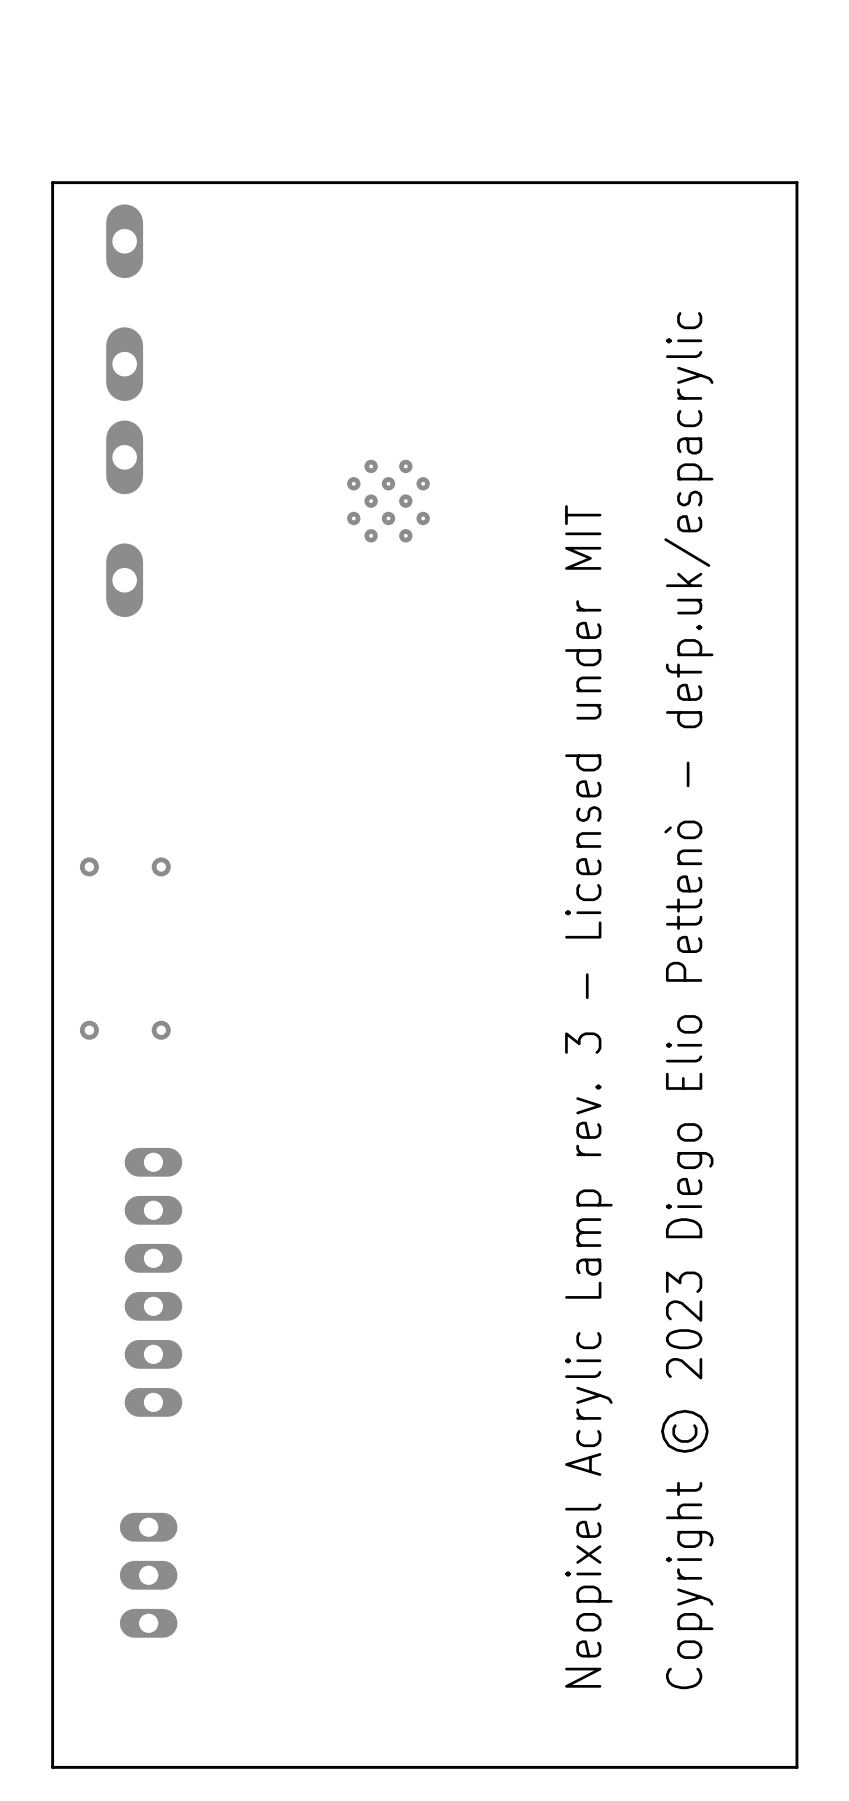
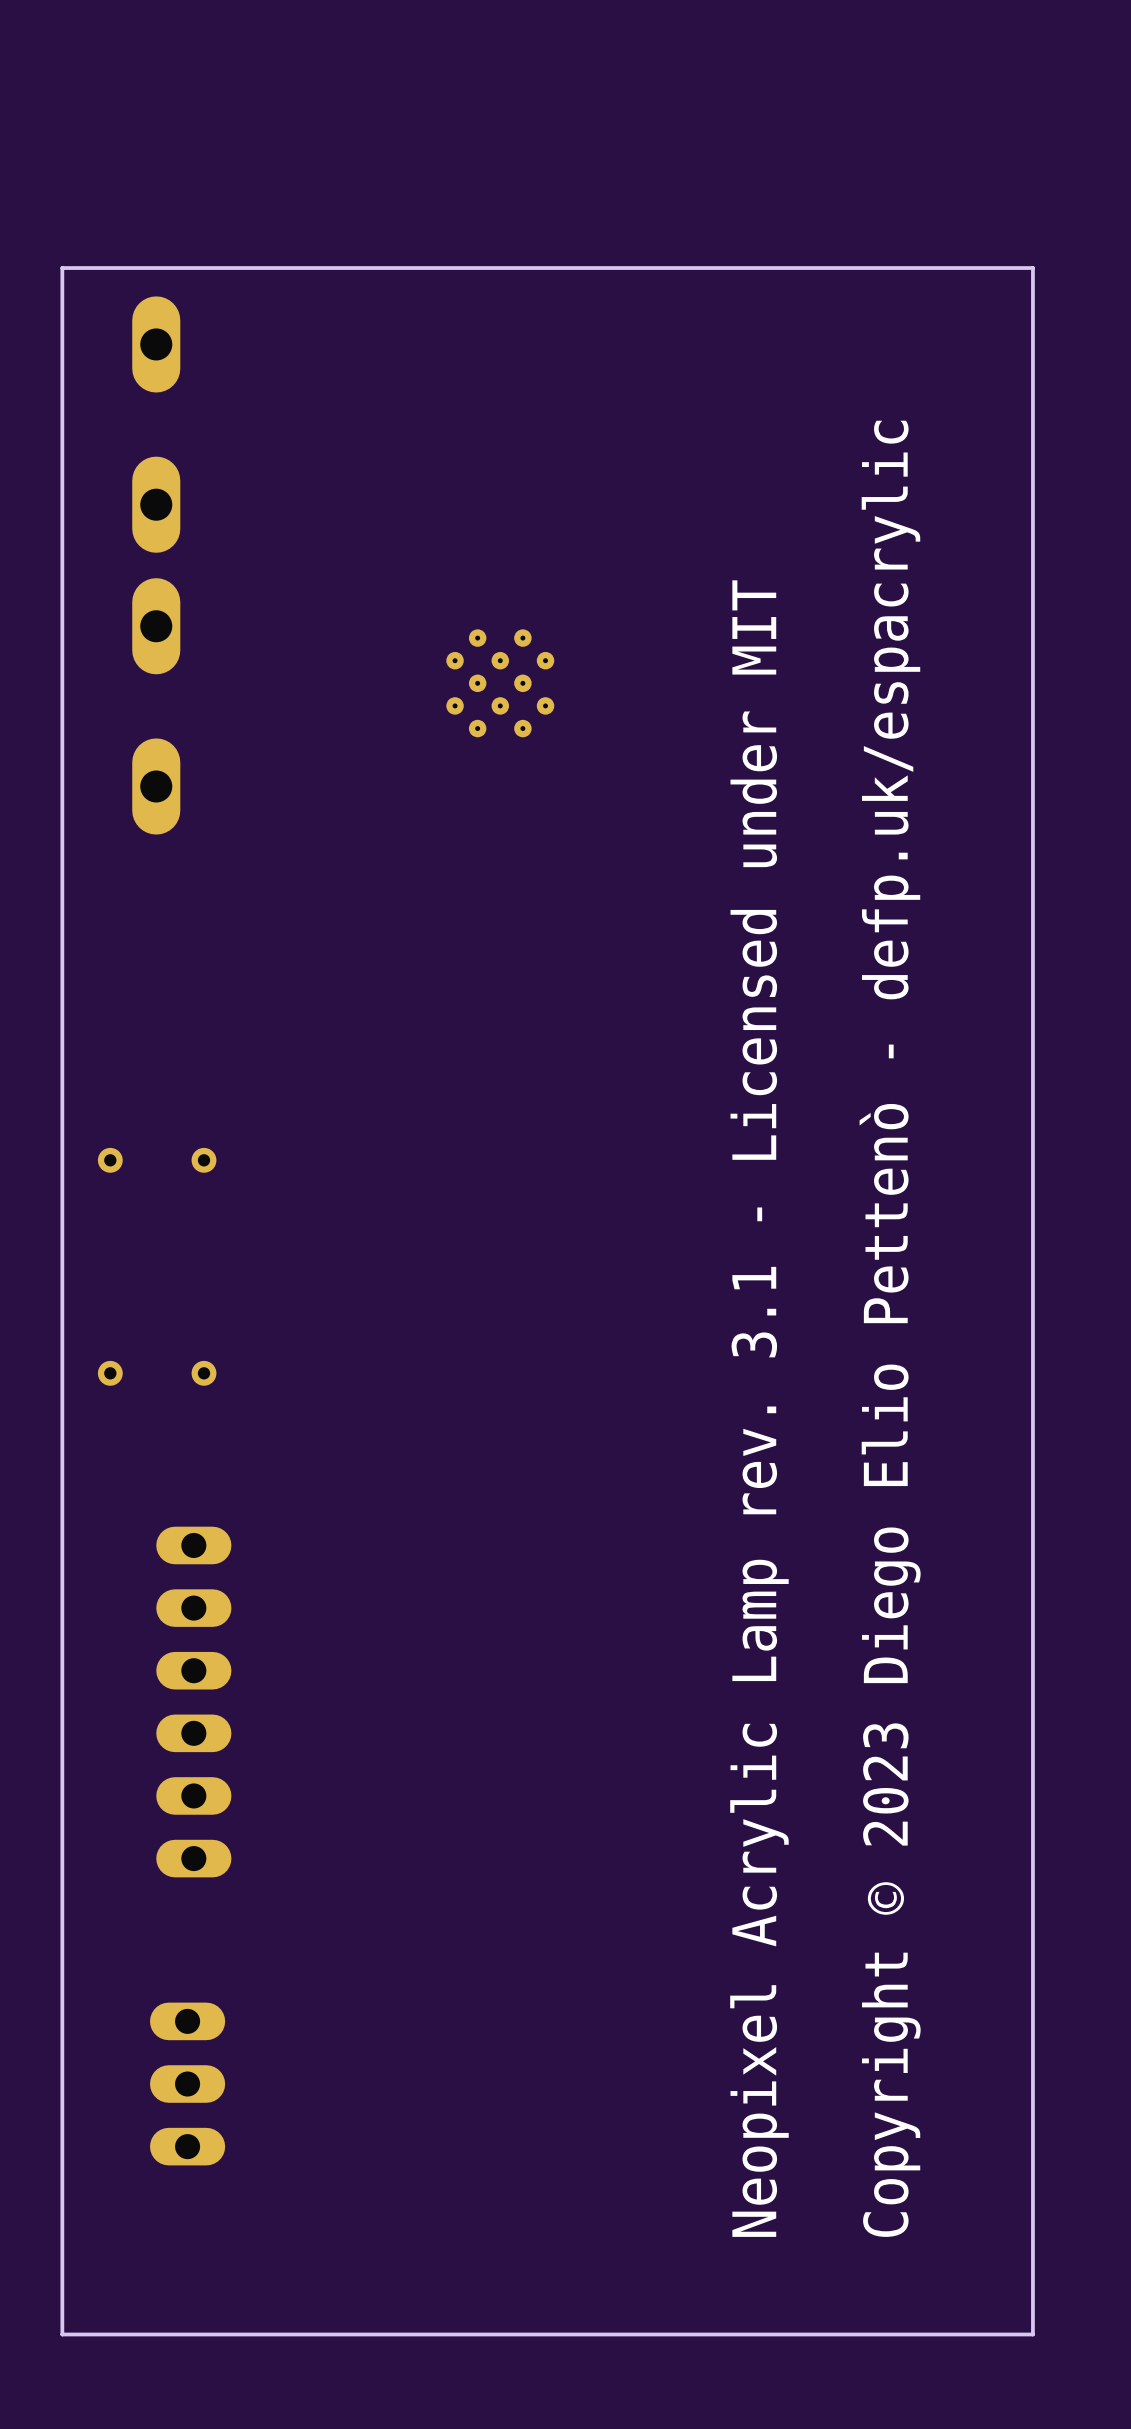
text: Neopixel Acrylic Lamp rev. 3 - Licensed under MIT (588, 1096) -> Neopixel Acrylic Lamp rev. 3.1 - Licensed under MIT (759, 1408)

